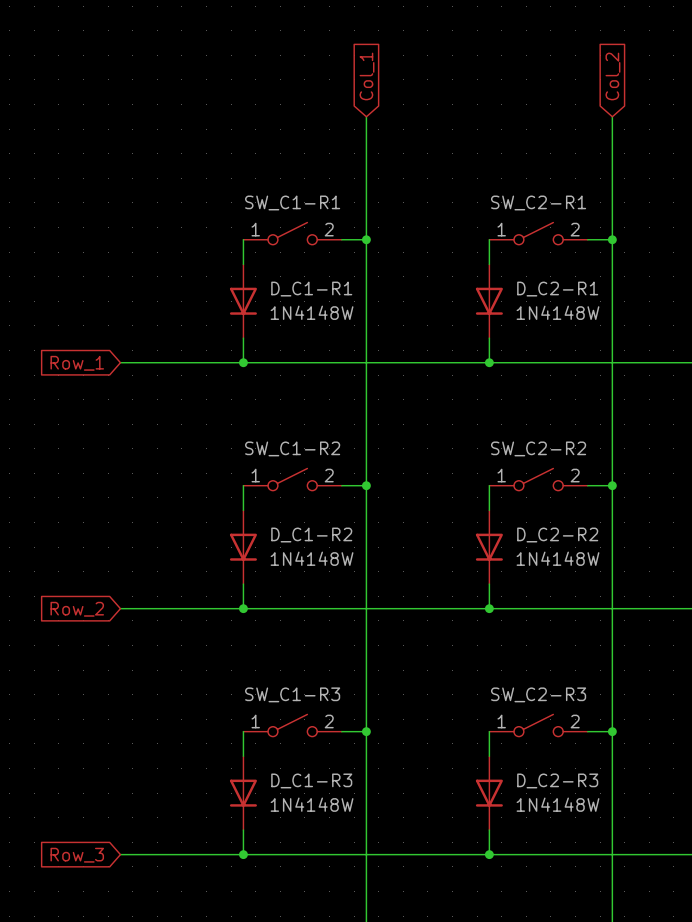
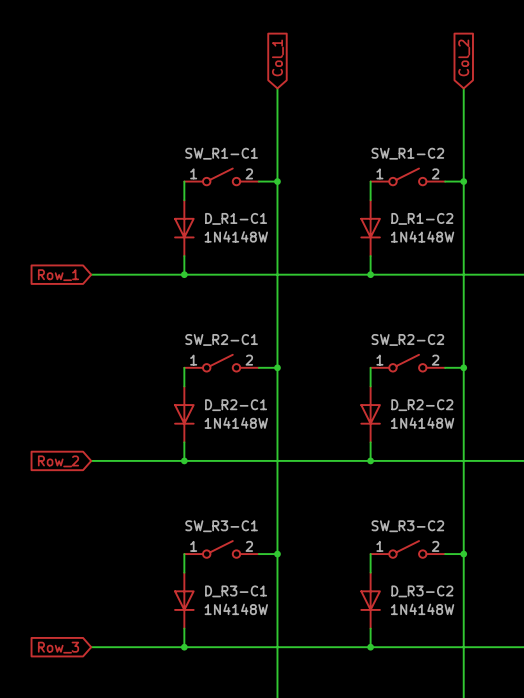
SW_C1-R1 name: SW_C1-R1 (292, 202) -> SW_R1-C1 (221, 153)
SW_C2-R1 name: SW_C2-R1 (538, 202) -> SW_R1-C2 (407, 153)
D_C1-R1 name: D_C1-R1 (311, 289) -> D_R1-C1 (236, 218)
D_C2-R1 name: D_C2-R1 (557, 289) -> D_R1-C2 (422, 218)
SW_C1-R2 name: SW_C1-R2 (292, 448) -> SW_R2-C1 (221, 339)
SW_C2-R2 name: SW_C2-R2 (538, 448) -> SW_R2-C2 (407, 339)
D_C1-R2 name: D_C1-R2 (311, 535) -> D_R2-C1 (236, 405)
D_C2-R2 name: D_C2-R2 (557, 535) -> D_R2-C2 (422, 405)
SW_C1-R3 name: SW_C1-R3 (292, 694) -> SW_R3-C1 (221, 526)
SW_C2-R3 name: SW_C2-R3 (538, 694) -> SW_R3-C2 (407, 526)
D_C1-R3 name: D_C1-R3 (311, 780) -> D_R3-C1 (236, 591)
D_C2-R3 name: D_C2-R3 (557, 780) -> D_R3-C2 (422, 591)

